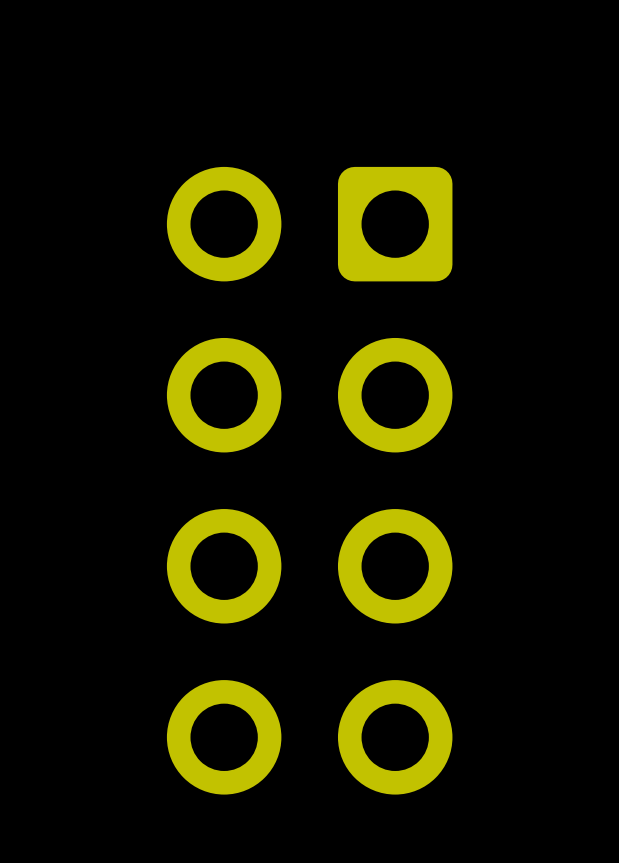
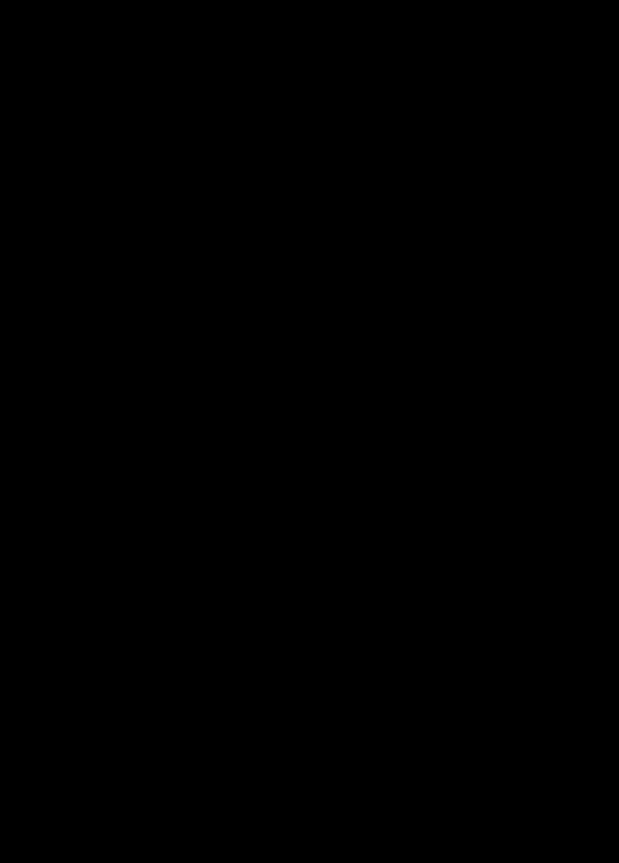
part: (309, 480) -> none

